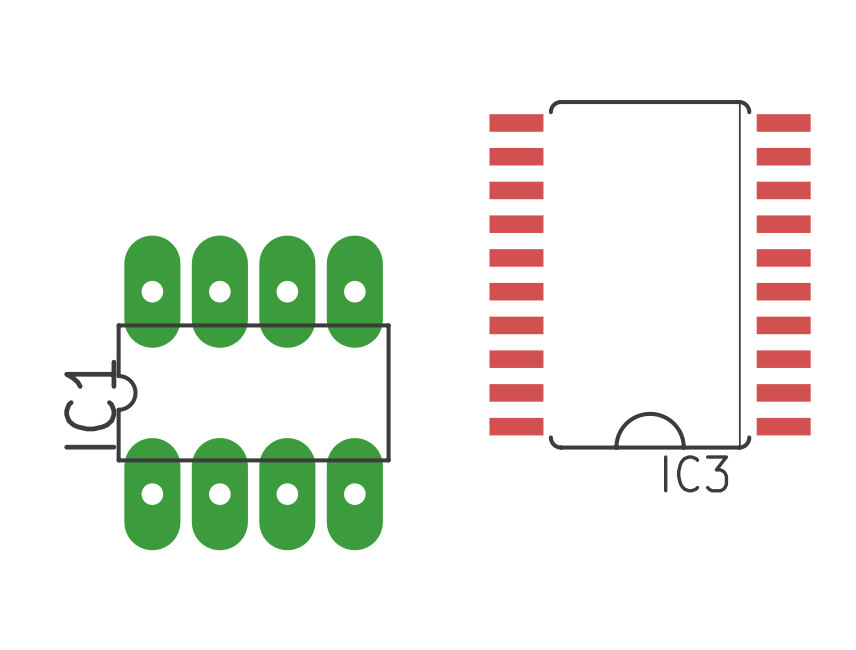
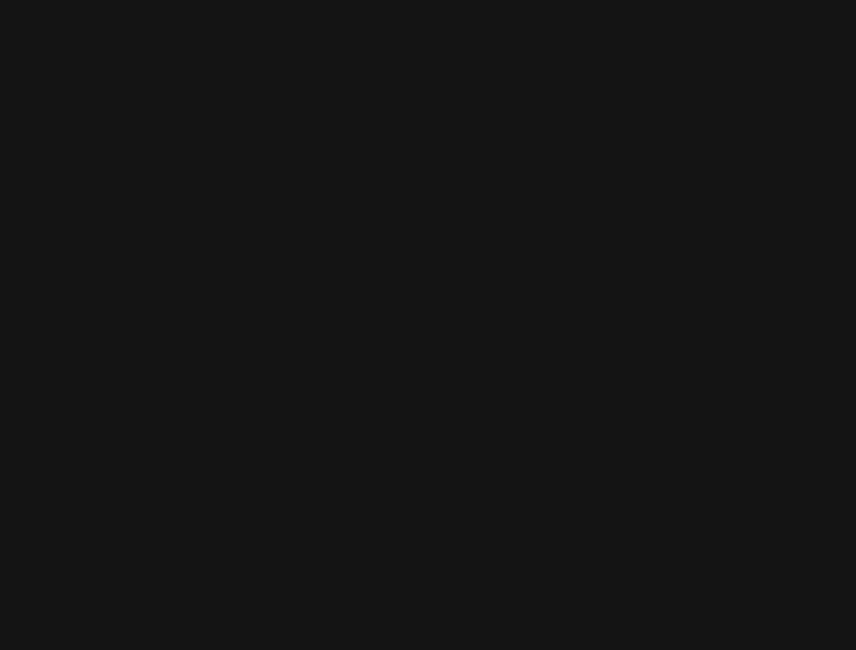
IC3: (650, 274) -> none
IC1: (253, 392) -> none

